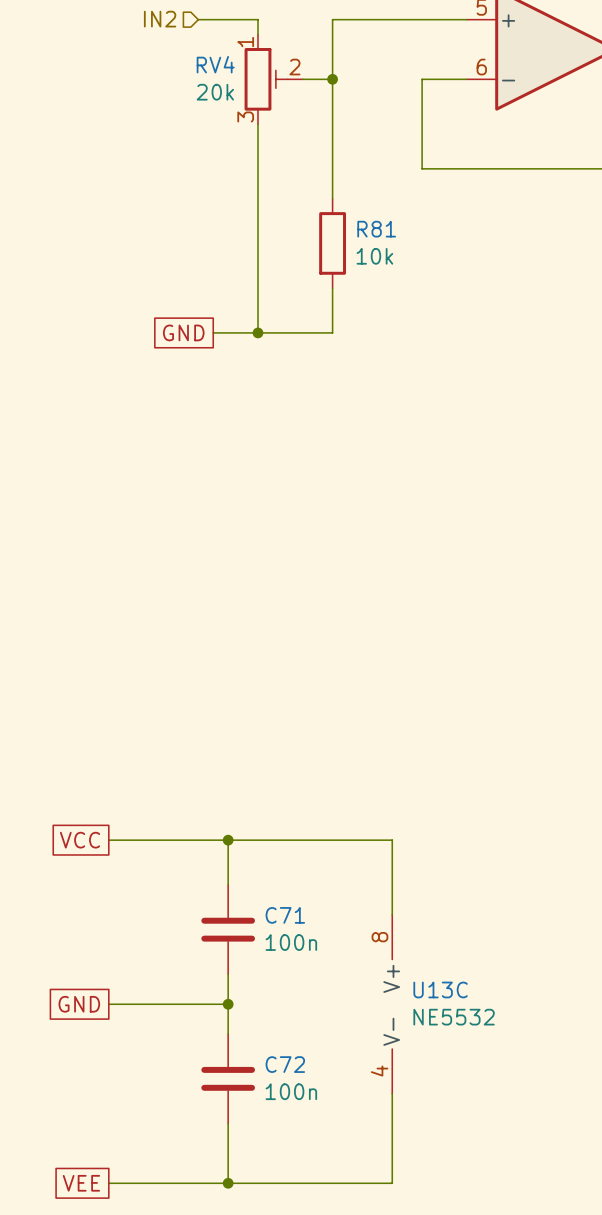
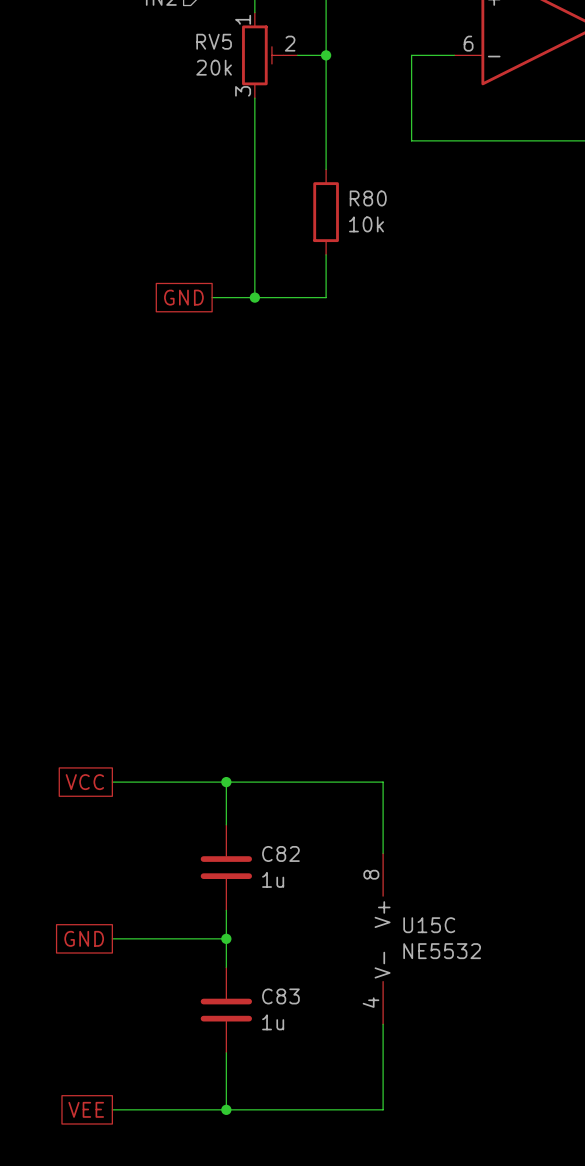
RV4 name: RV4 (215, 64) -> RV5 (214, 41)
R81 name: R81 (376, 229) -> R80 (368, 198)
C71 name: C71 (285, 915) -> C82 (280, 853)
C71 value: 100n (291, 942) -> 1u (273, 879)
U13C name: U13C (440, 989) -> U15C (429, 925)
C72 name: C72 (285, 1064) -> C83 (280, 996)
C72 value: 100n (291, 1091) -> 1u (273, 1022)

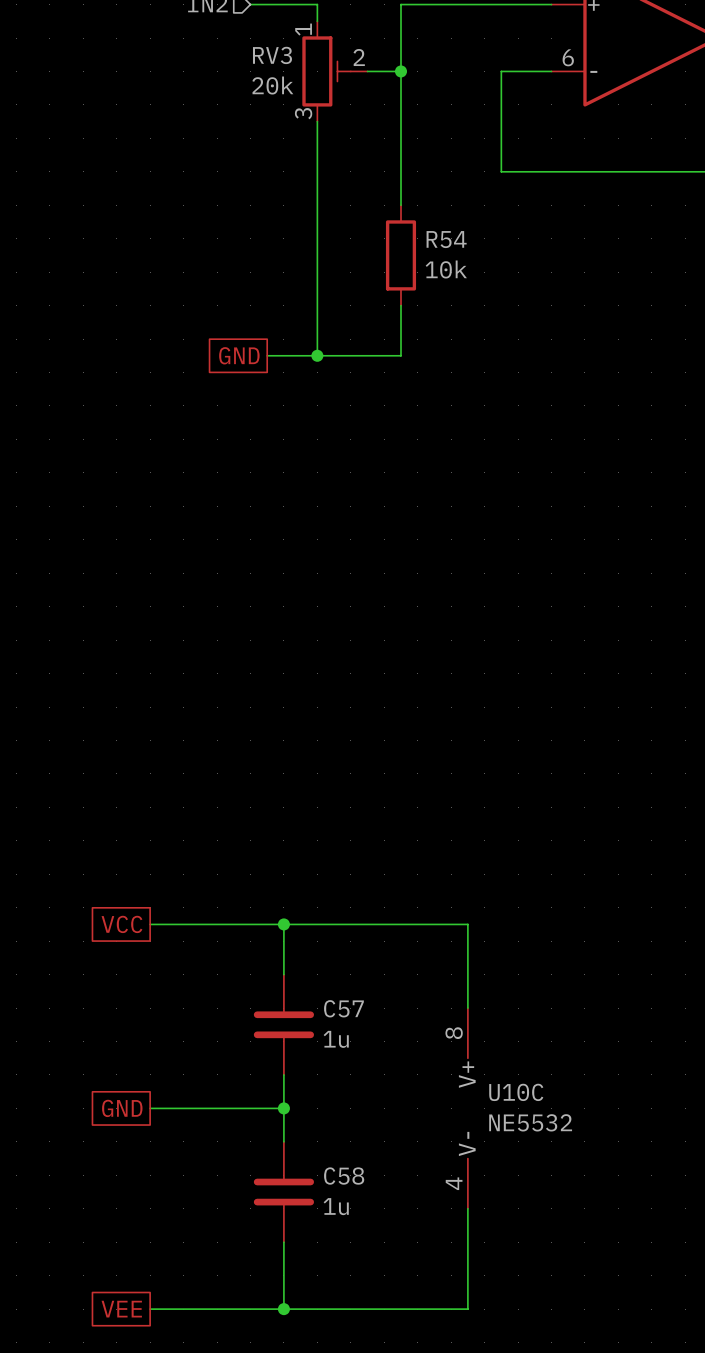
RV5 name: RV5 (214, 41) -> RV3 (272, 55)
R80 name: R80 (368, 198) -> R54 (446, 239)
C82 name: C82 (280, 853) -> C57 (343, 1008)
U15C name: U15C (429, 925) -> U10C (516, 1092)
C83 name: C83 (280, 996) -> C58 (344, 1176)

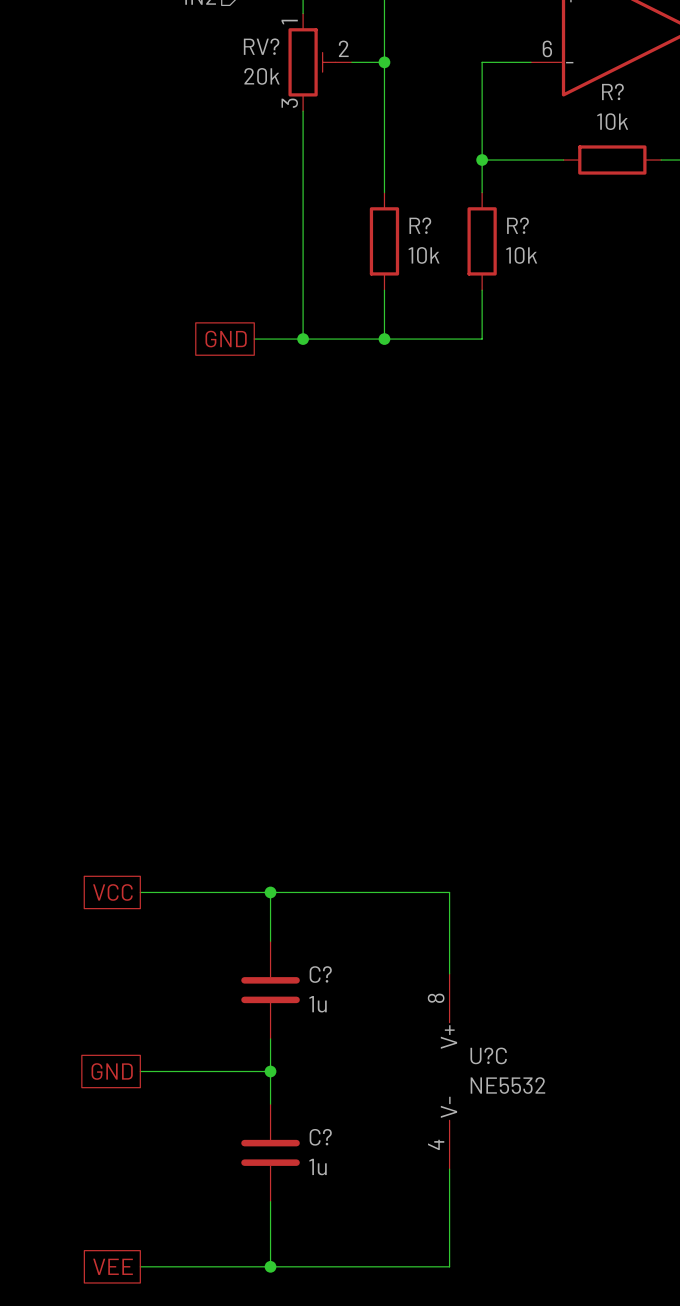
RV3 name: RV3 (272, 55) -> RV? (261, 46)
wire: none -> (482, 160) (482, 192)
junction: none -> (482, 160)
wire: (584, 171) (685, 171) -> none
R?: none -> 10k (612, 160)
R54 name: R54 (446, 239) -> R? (420, 225)
R?: none -> 10k (482, 241)
wire: none -> (482, 290) (482, 339) (384, 339)
junction: none -> (384, 339)
C57 name: C57 (343, 1008) -> C? (320, 974)
U10C name: U10C (516, 1092) -> U?C (488, 1055)
C58 name: C58 (344, 1176) -> C? (320, 1137)

